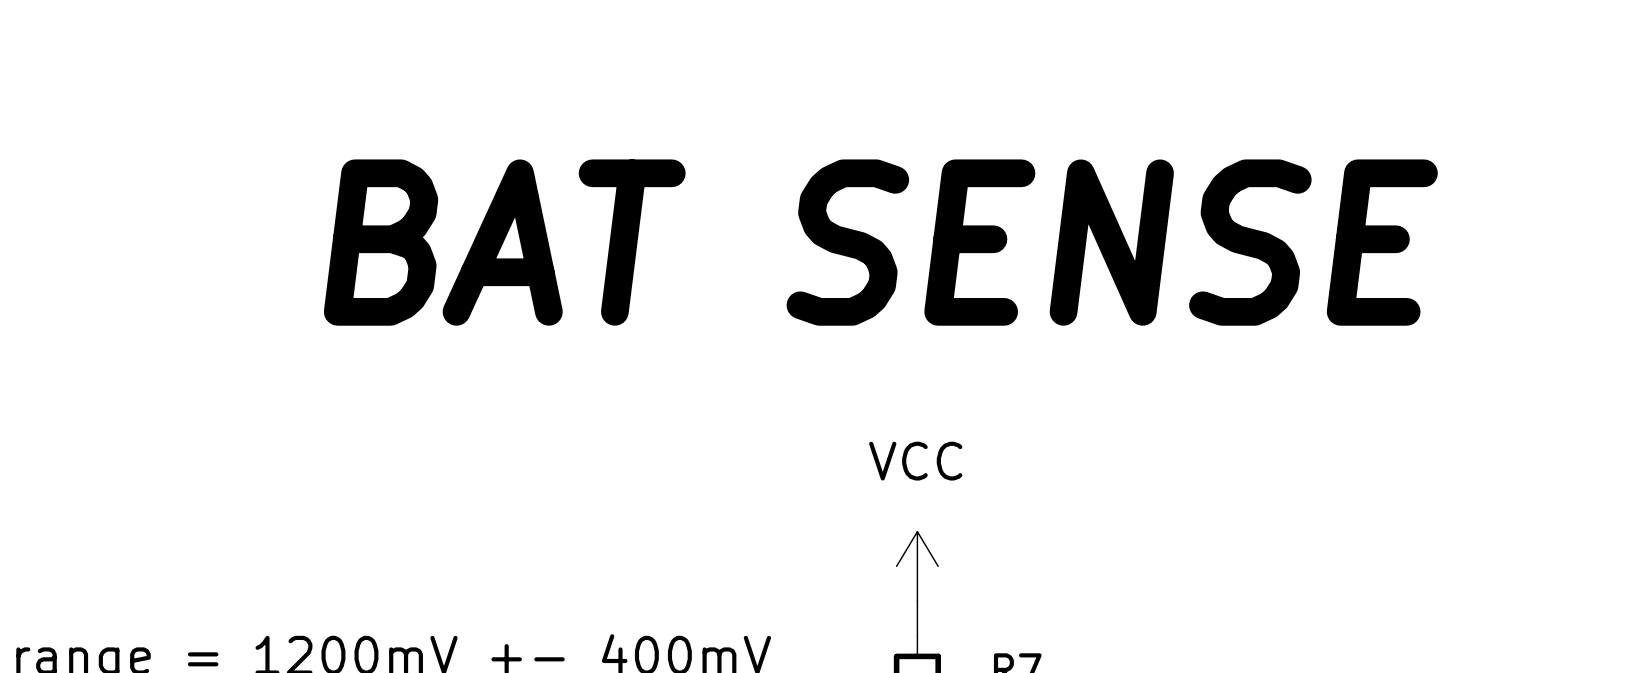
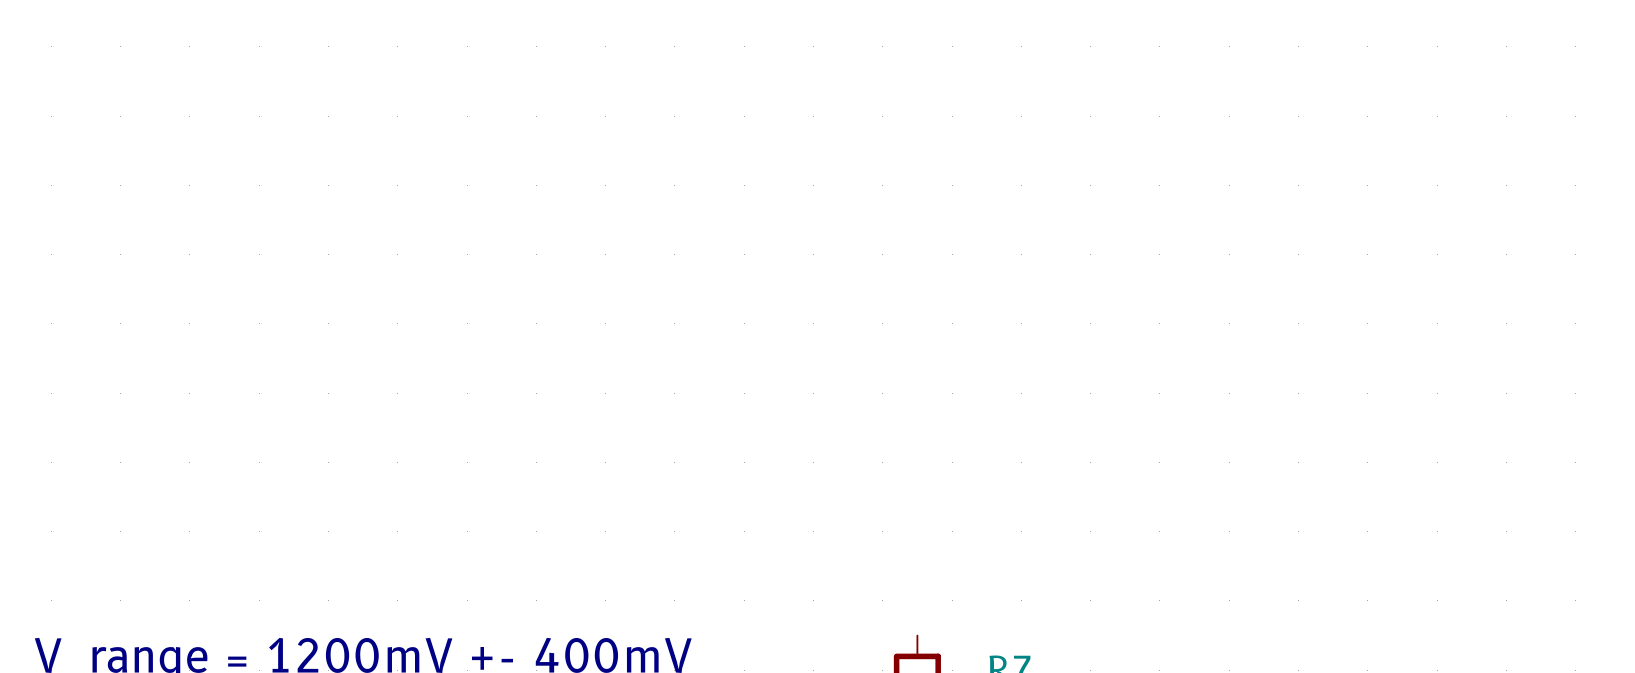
text: BAT SENSE (880, 242) -> none
power symbol: VCC (917, 566) -> none
wire: (917, 600) (917, 635) -> none

